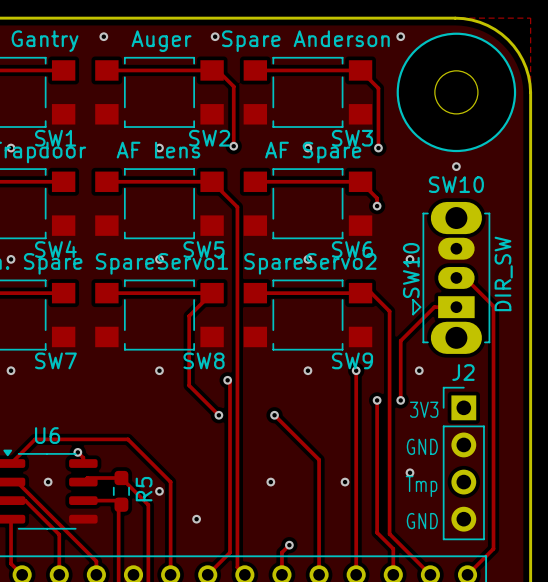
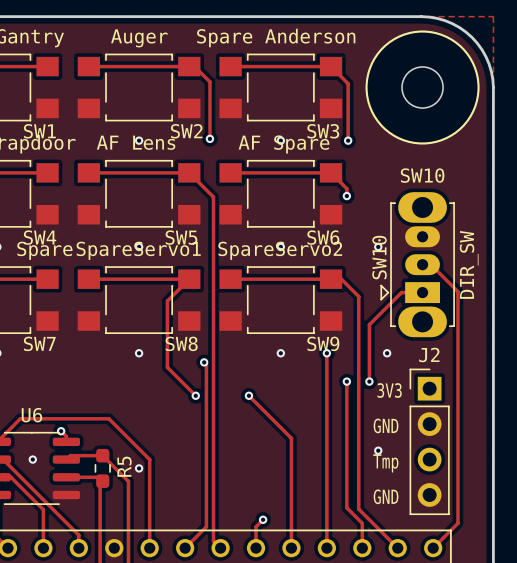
via: (103, 36) -> none
via: (215, 36) -> none
via: (400, 36) -> none
via: (456, 166) -> none
via: (270, 482) -> none
via: (345, 482) -> none
via: (196, 519) -> none

